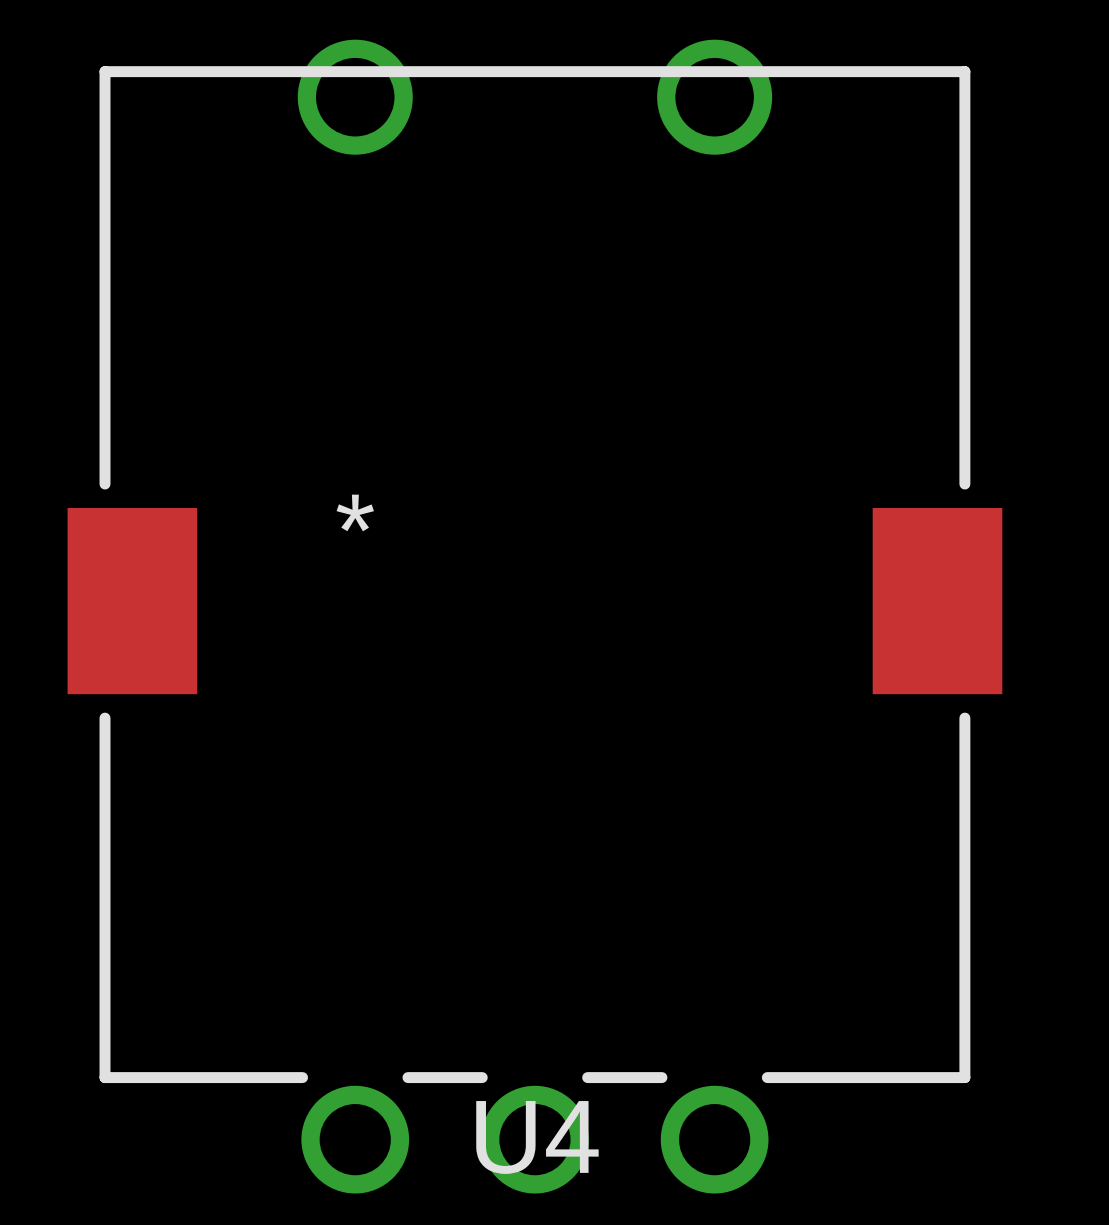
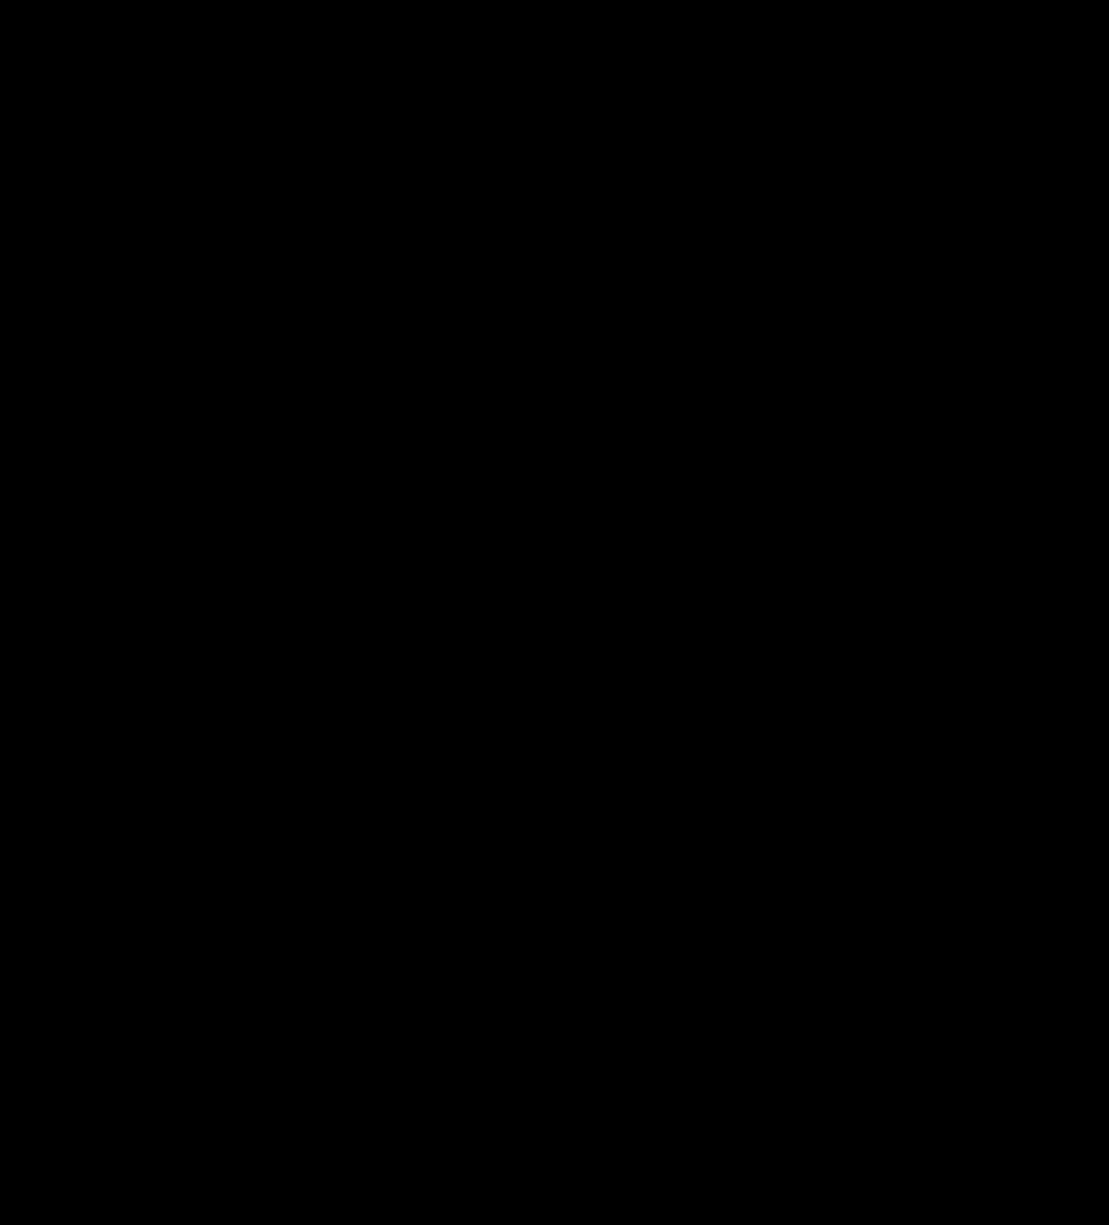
U4: (534, 616) -> none

